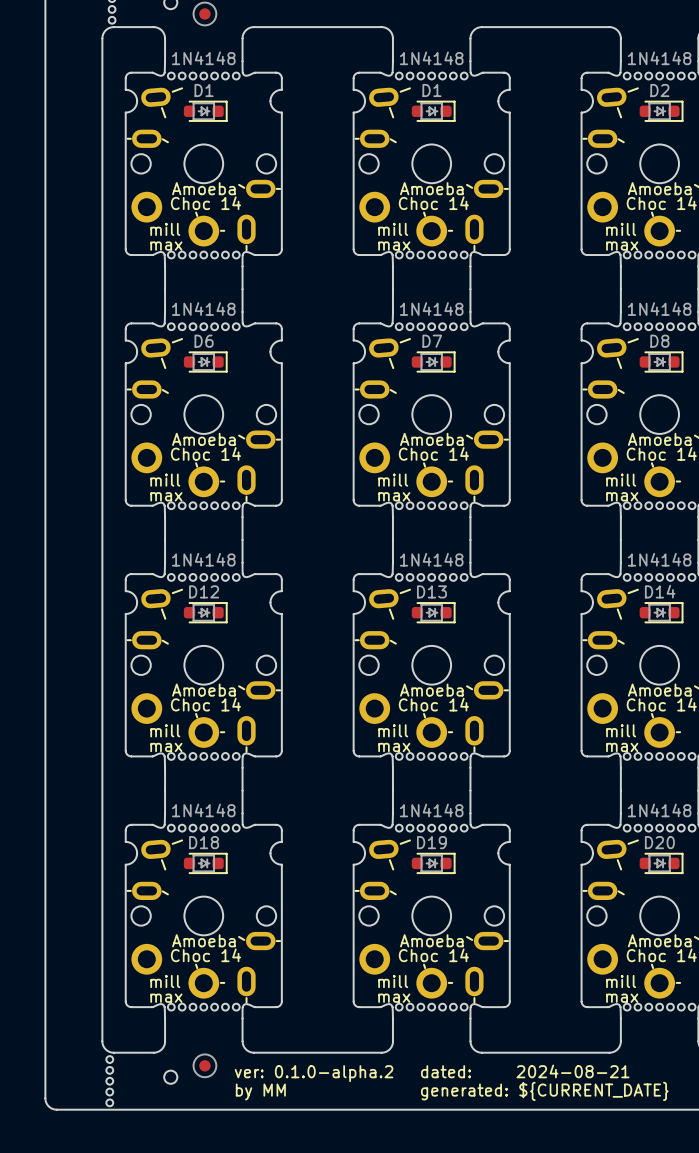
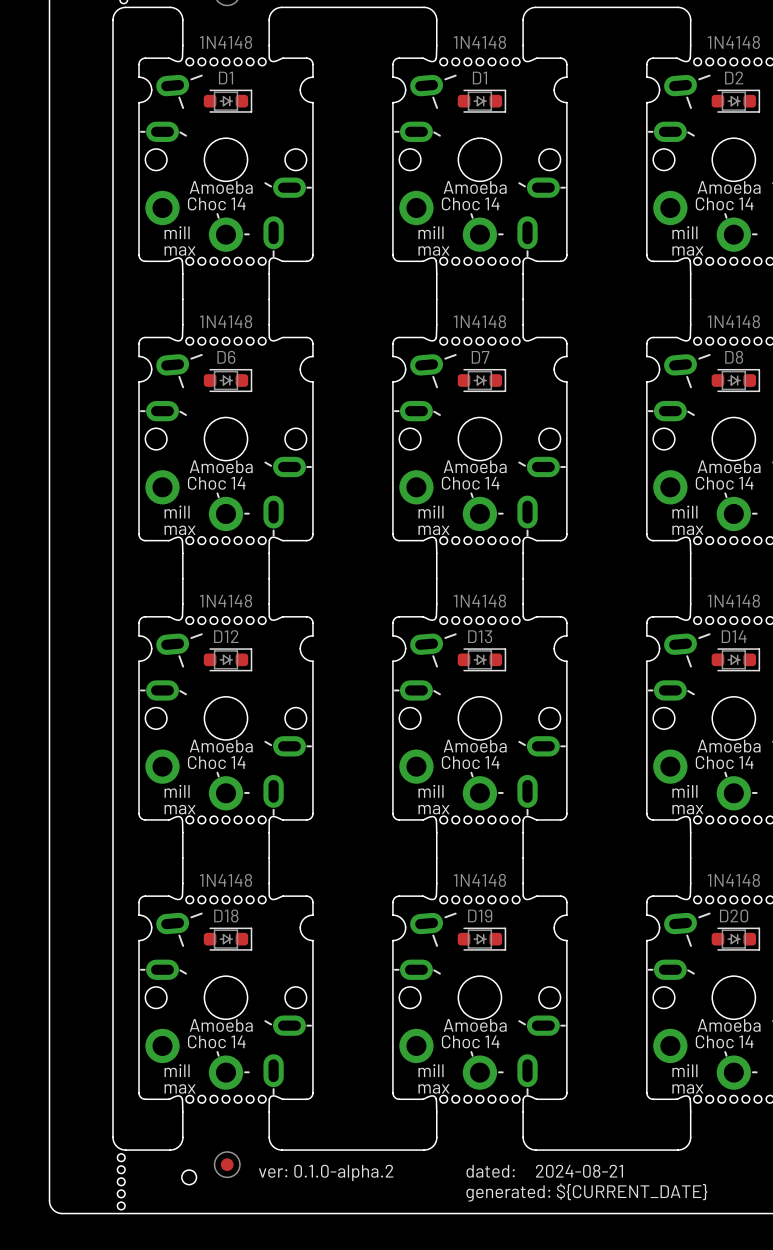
text: by MM (260, 1091) -> none

